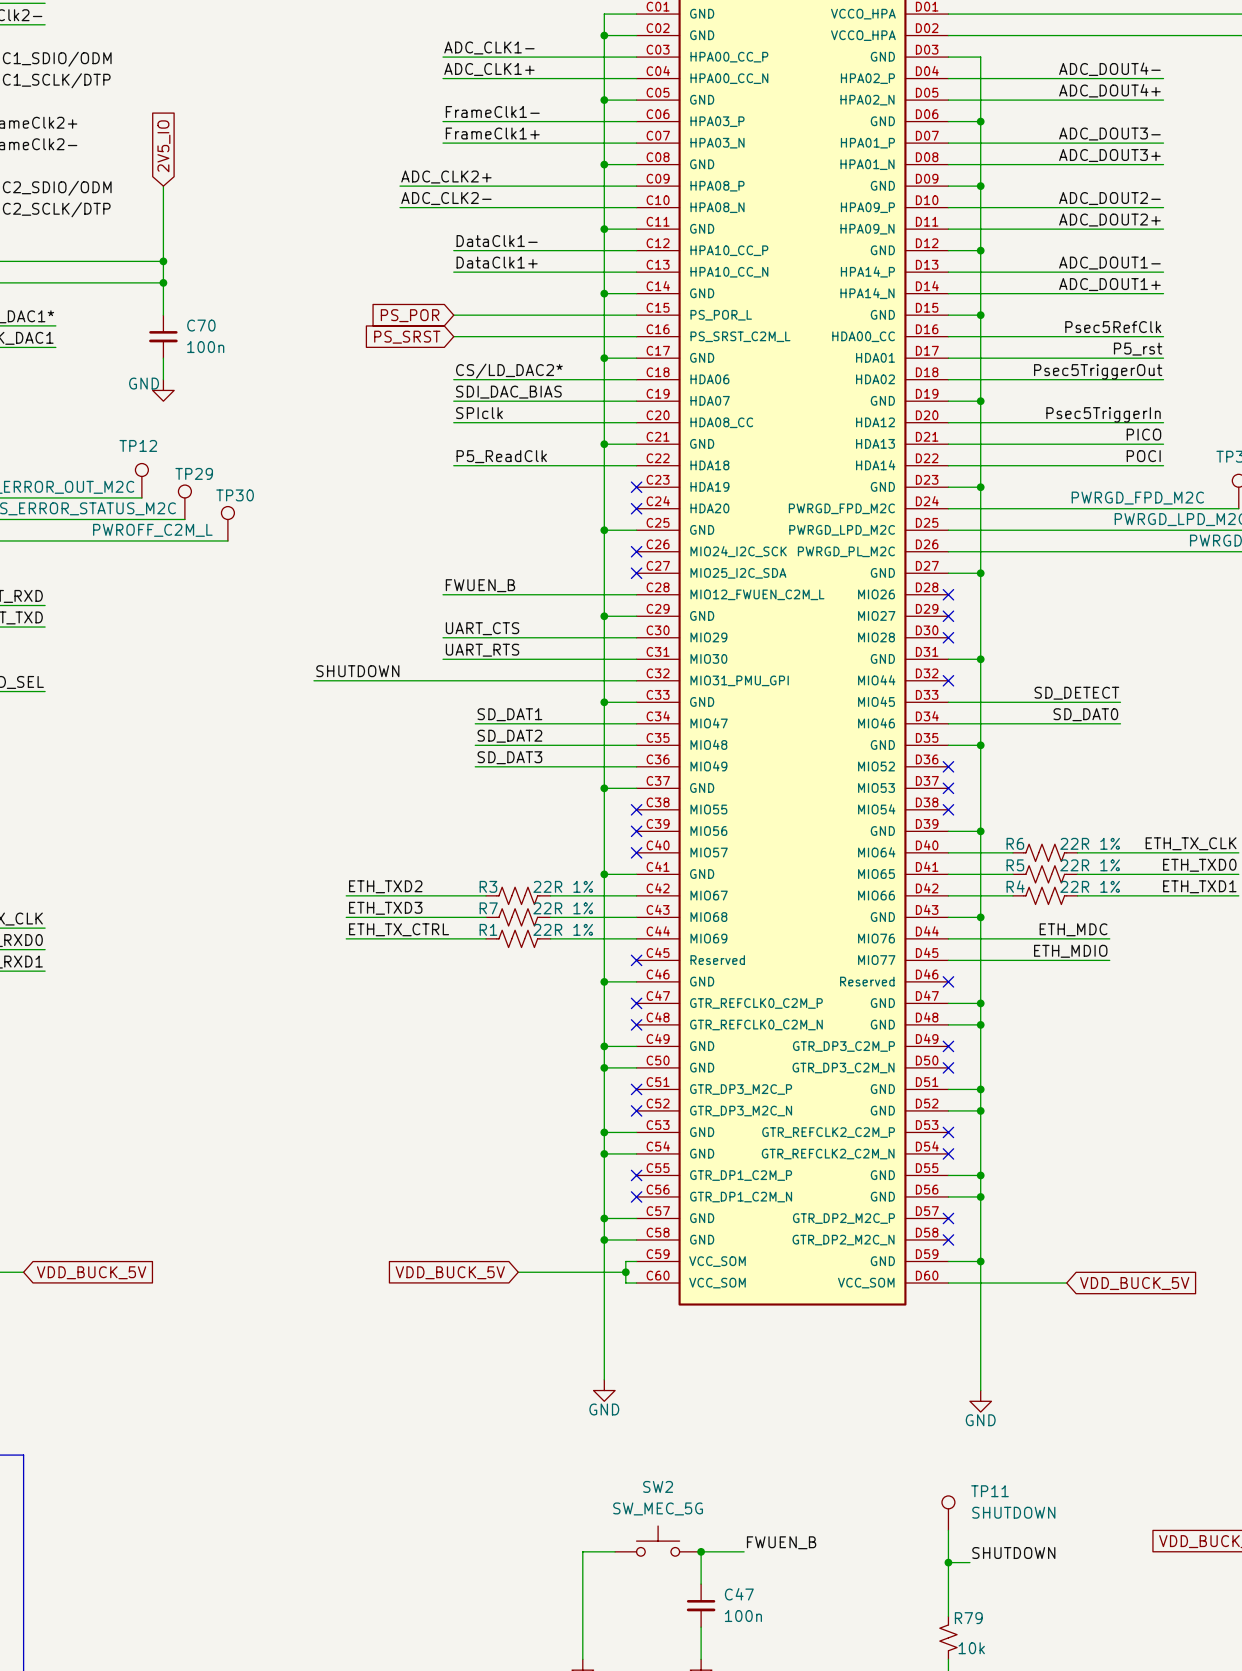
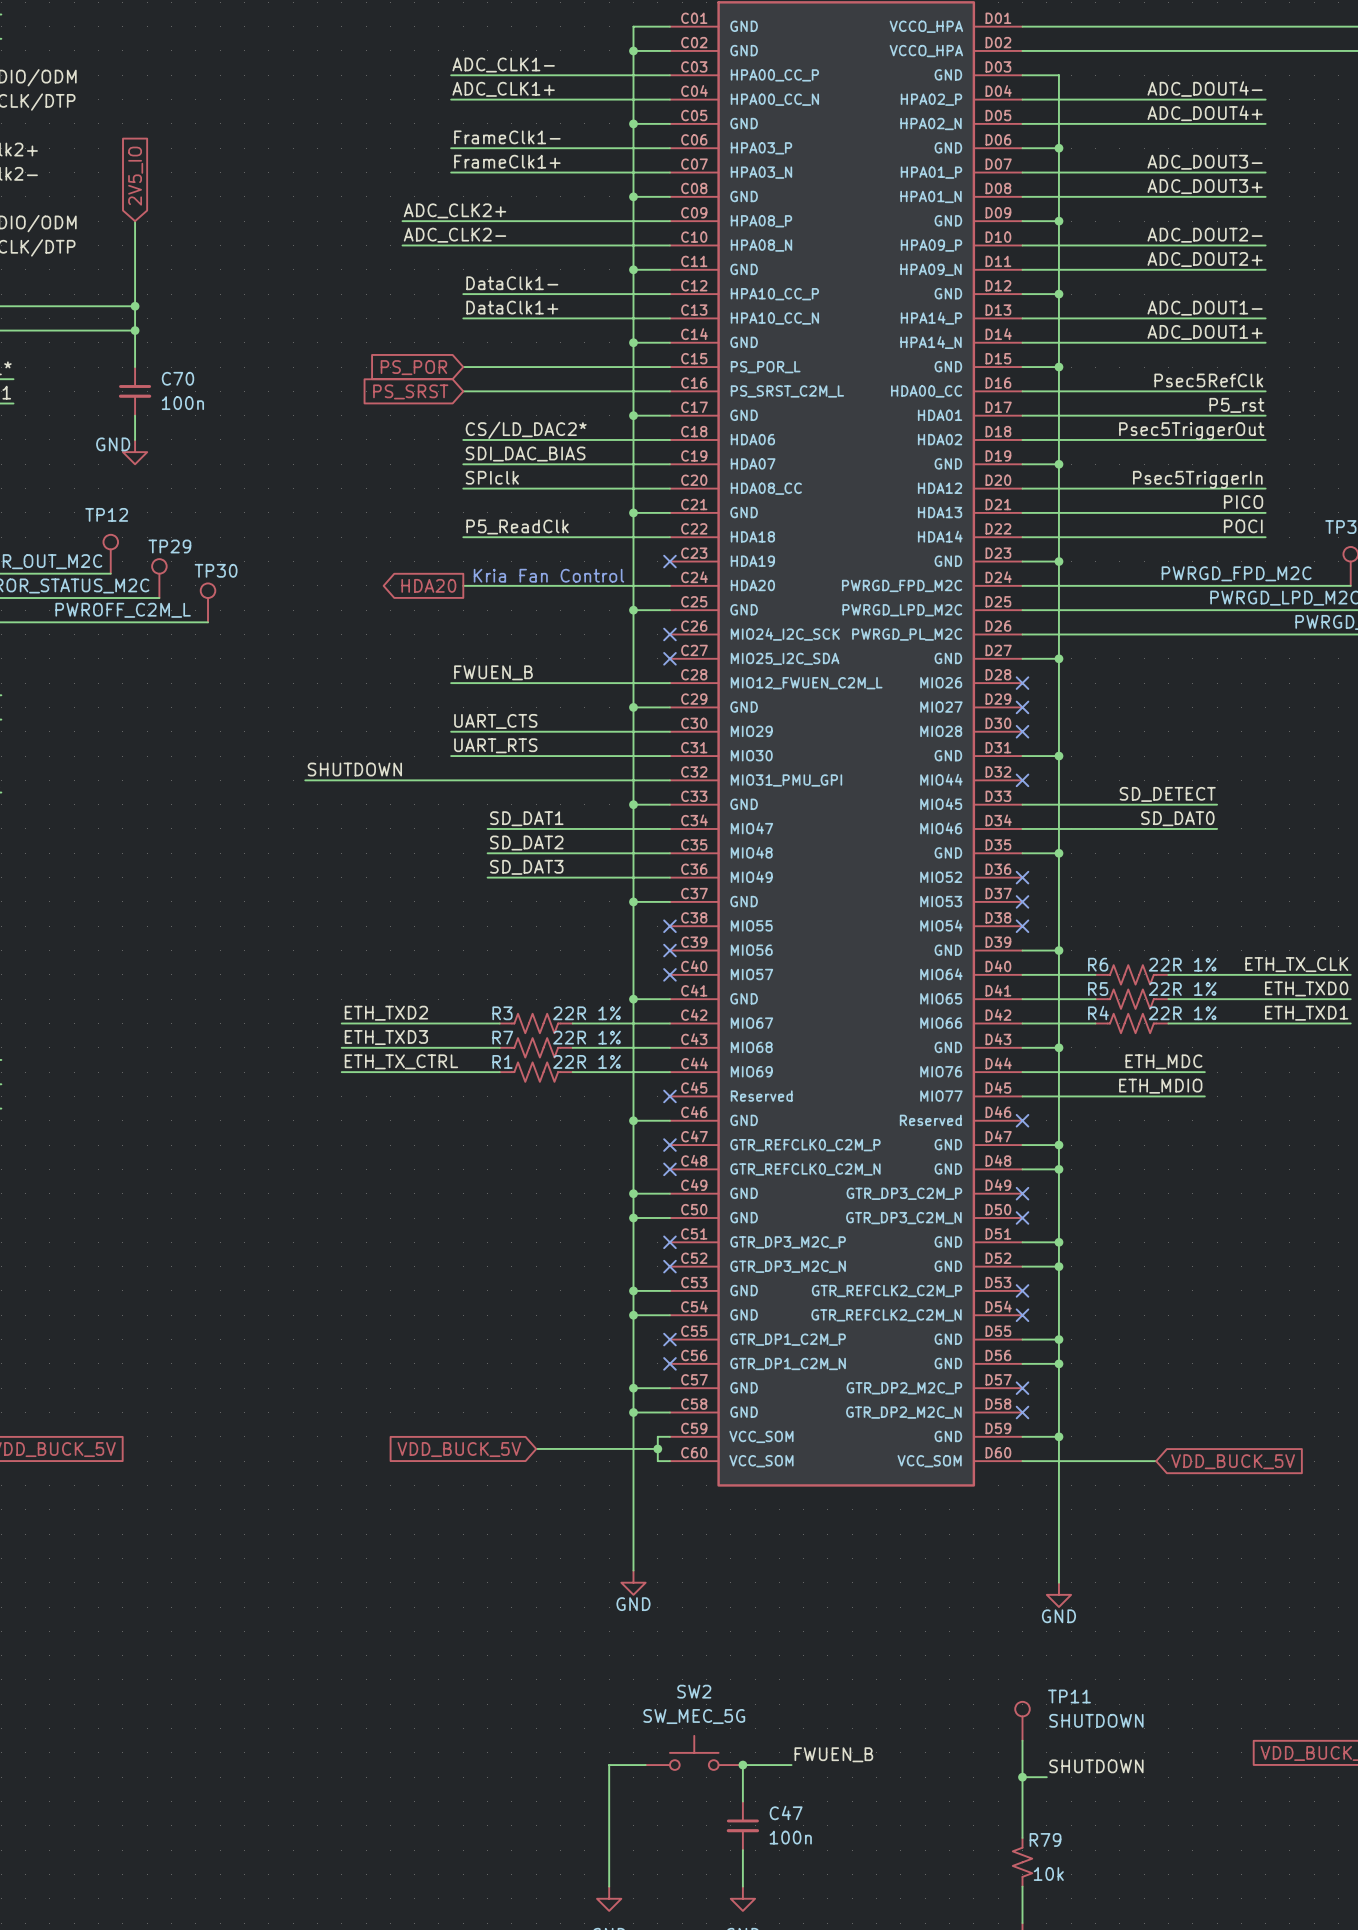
text: none -> Kria Fan Control (548, 575)
global label: none -> HDA20 (428, 585)
wire: none -> (463, 585) (669, 585)
no-connect mark: (636, 508) -> none

